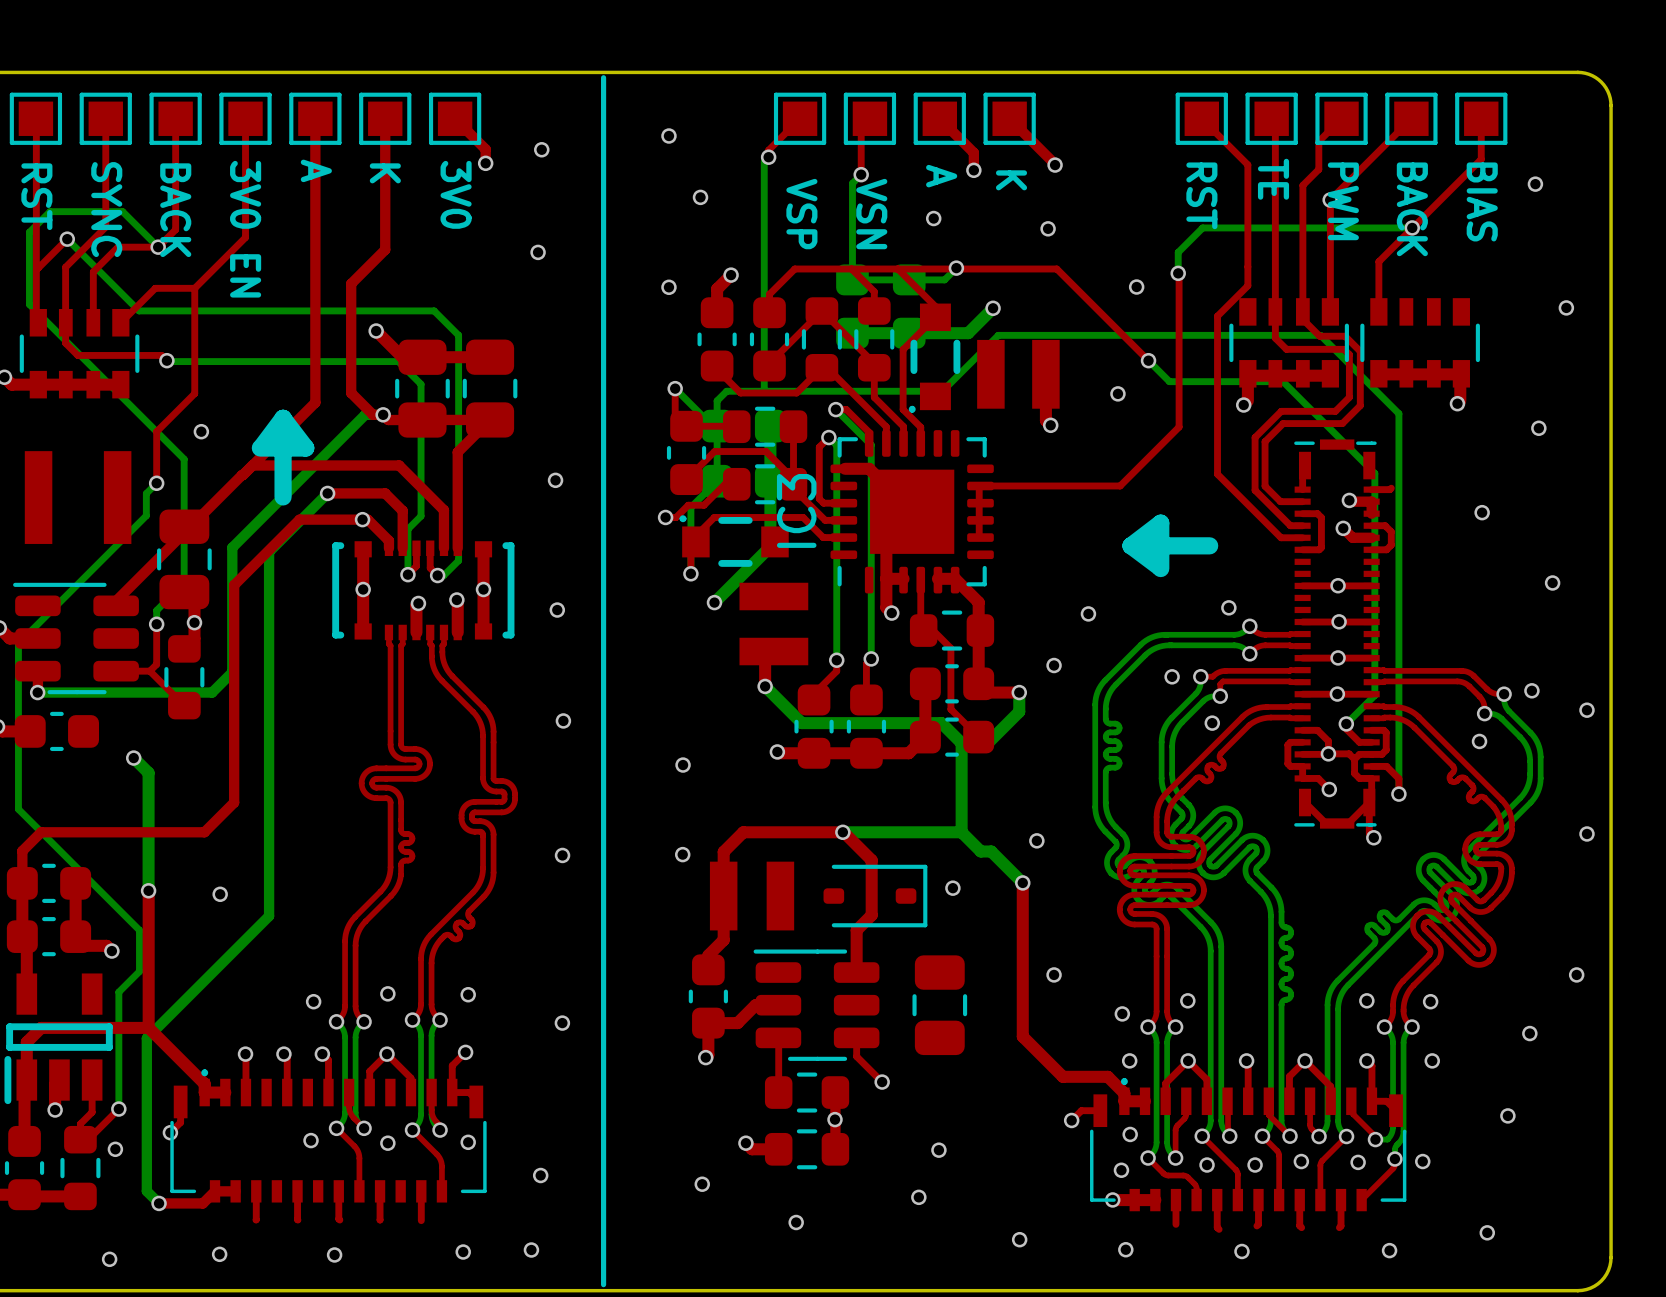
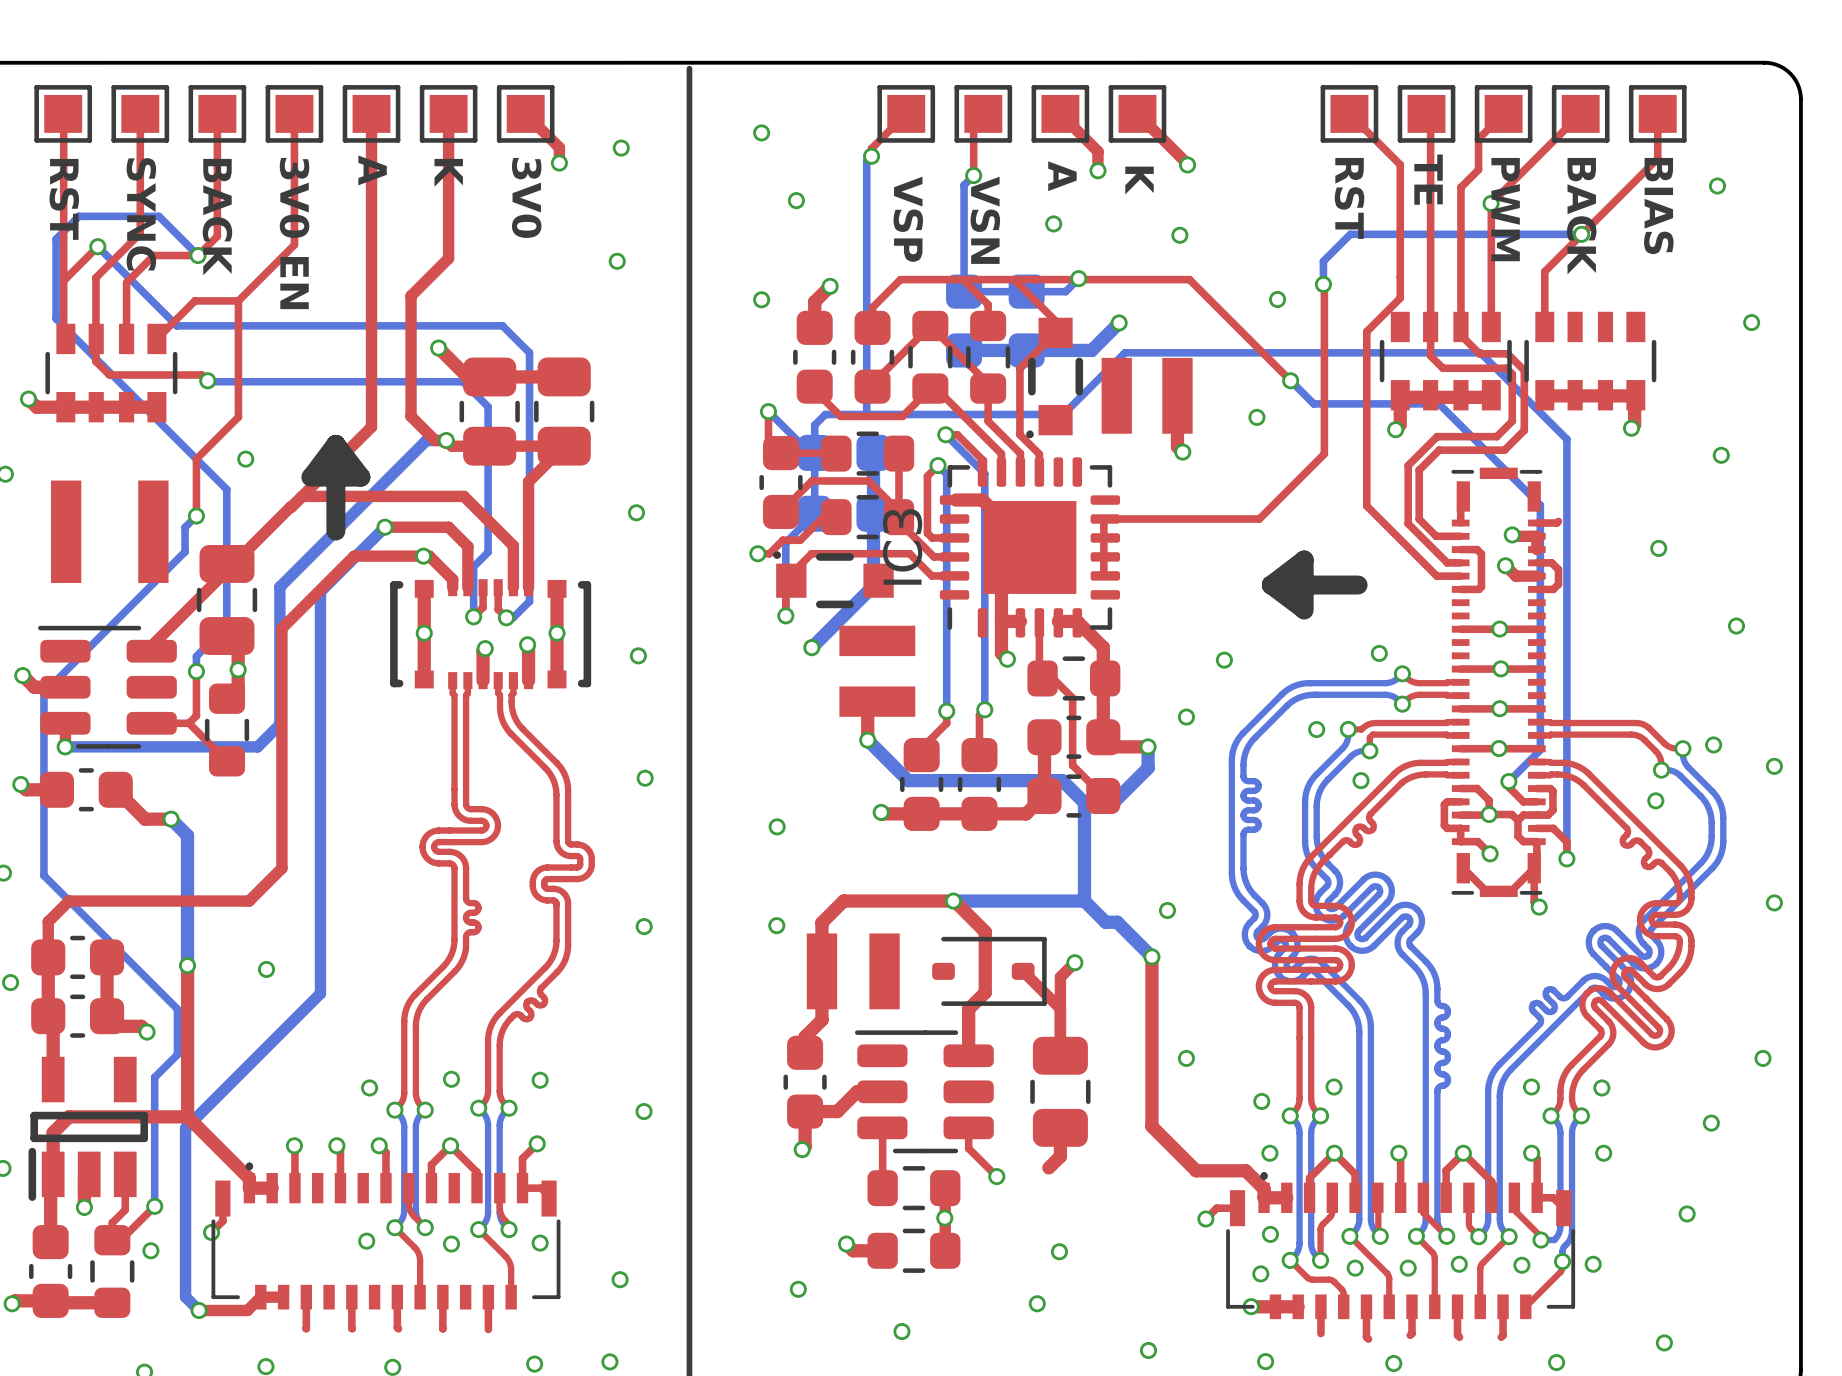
top track: none -> (115, 789) (145, 819) (171, 819)
top track: none -> (1074, 962) (1060, 977) (1060, 1055)
top track: none -> (1023, 971) (1060, 1008)
top track: none -> (1060, 1127) (1060, 1156) (1048, 1167)

